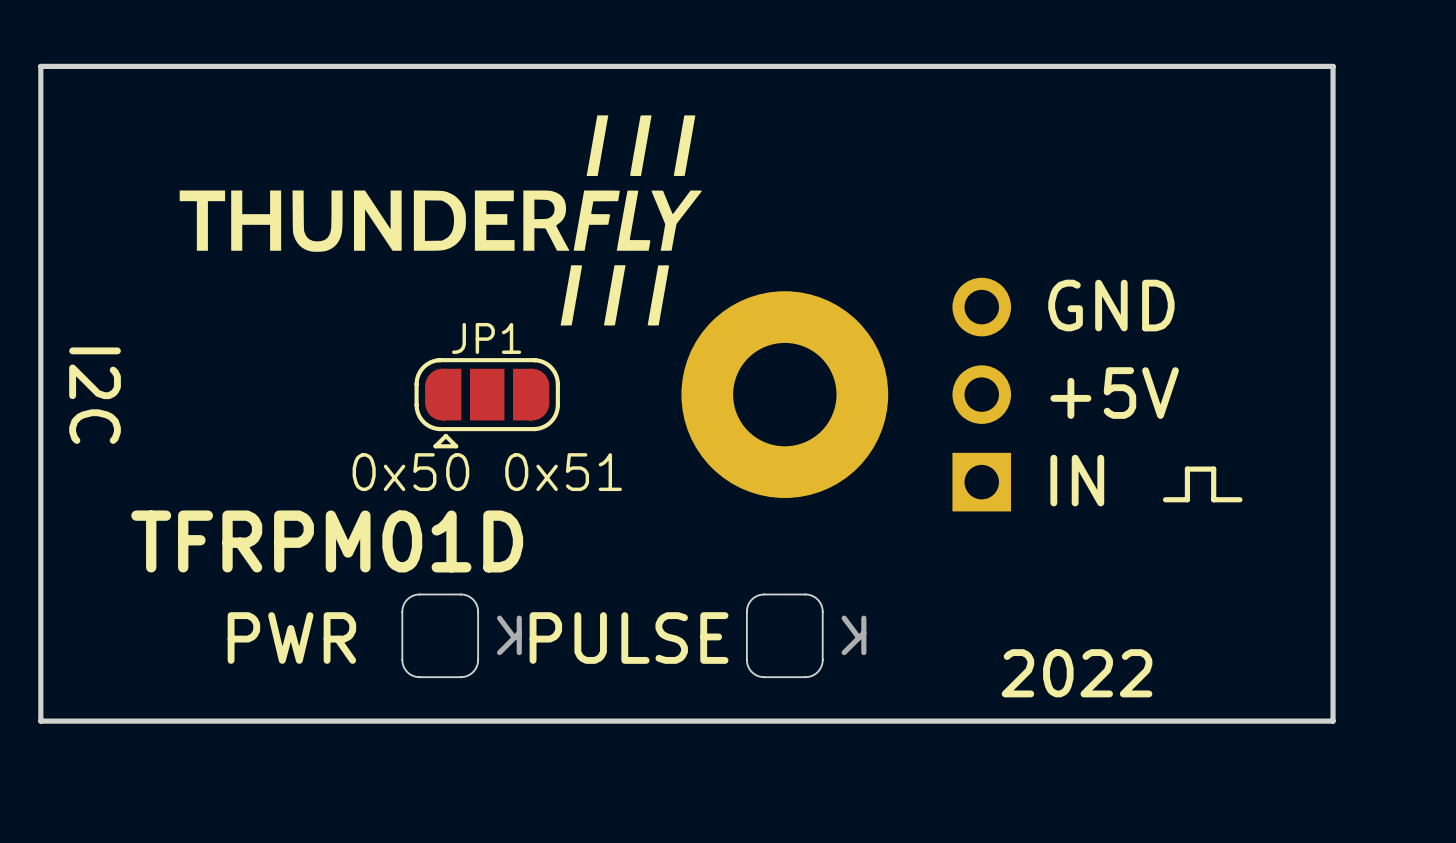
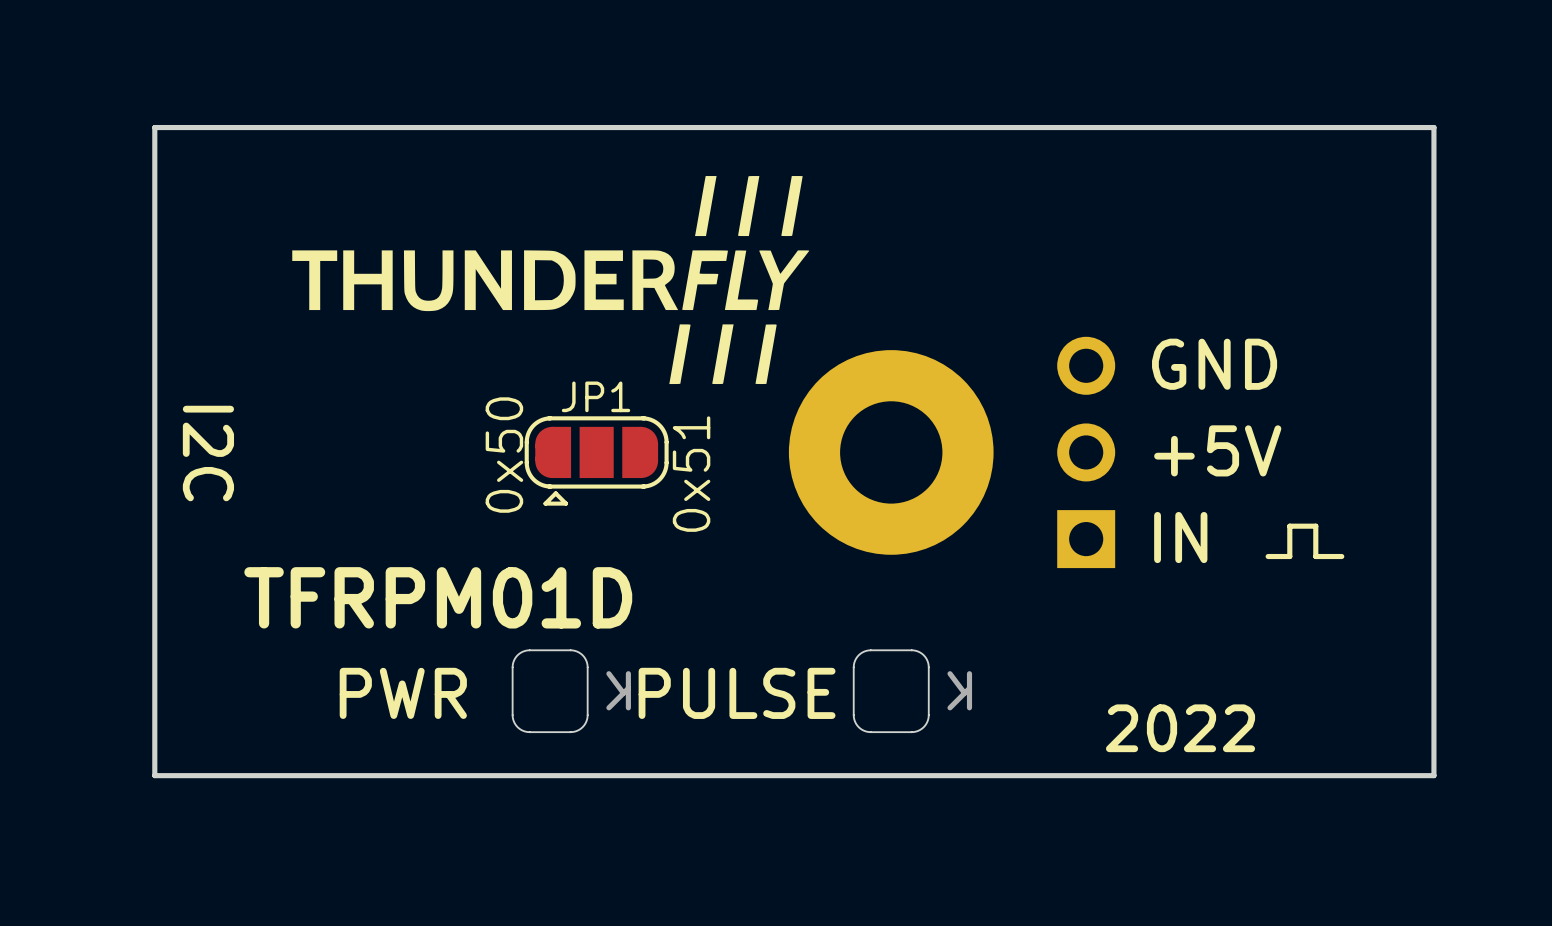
text: none -> 0x50 (504, 455)
text: none -> 0x51 (691, 474)
text: 0x50 0x51 (487, 472) -> none

